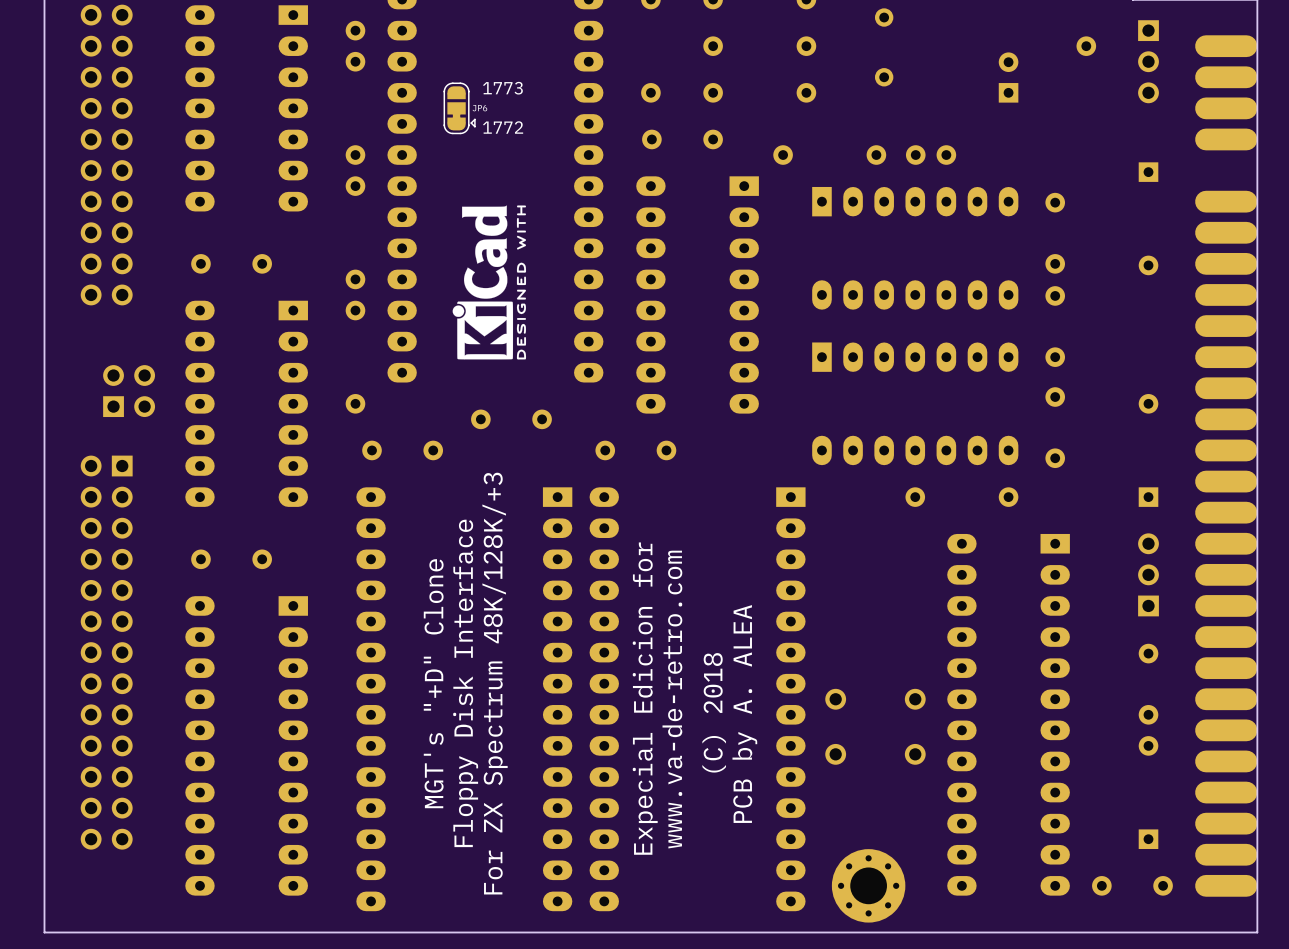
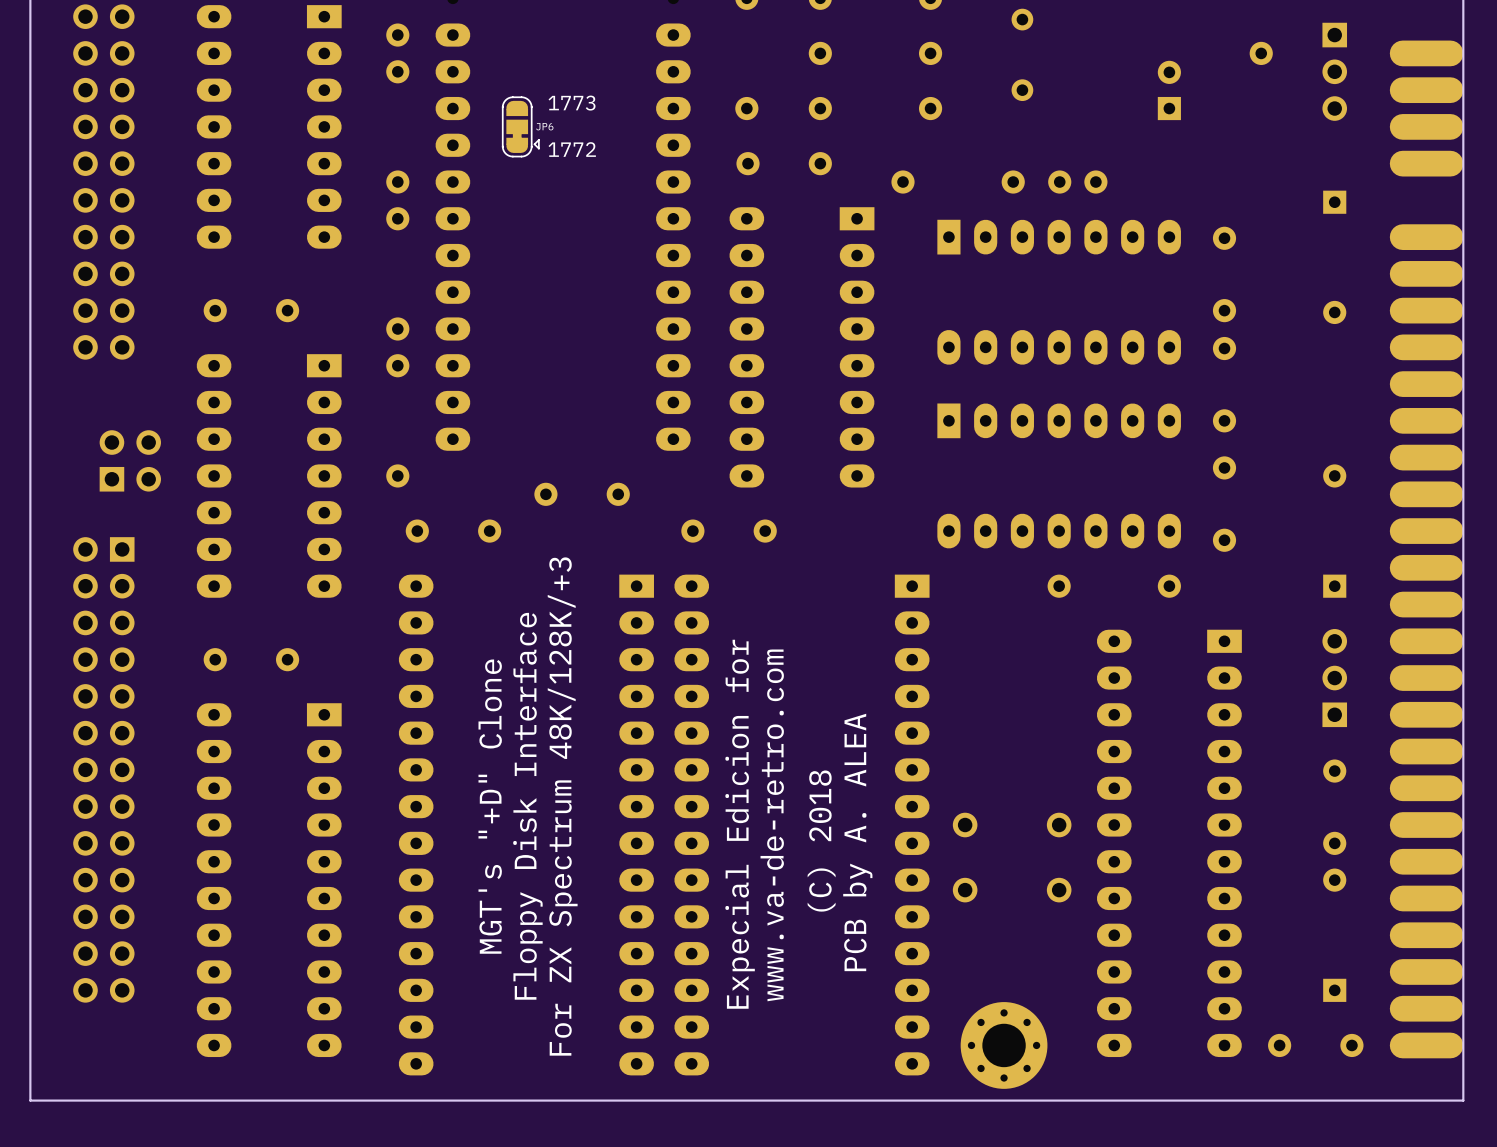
drawing: [452, 205, 527, 360] -> none

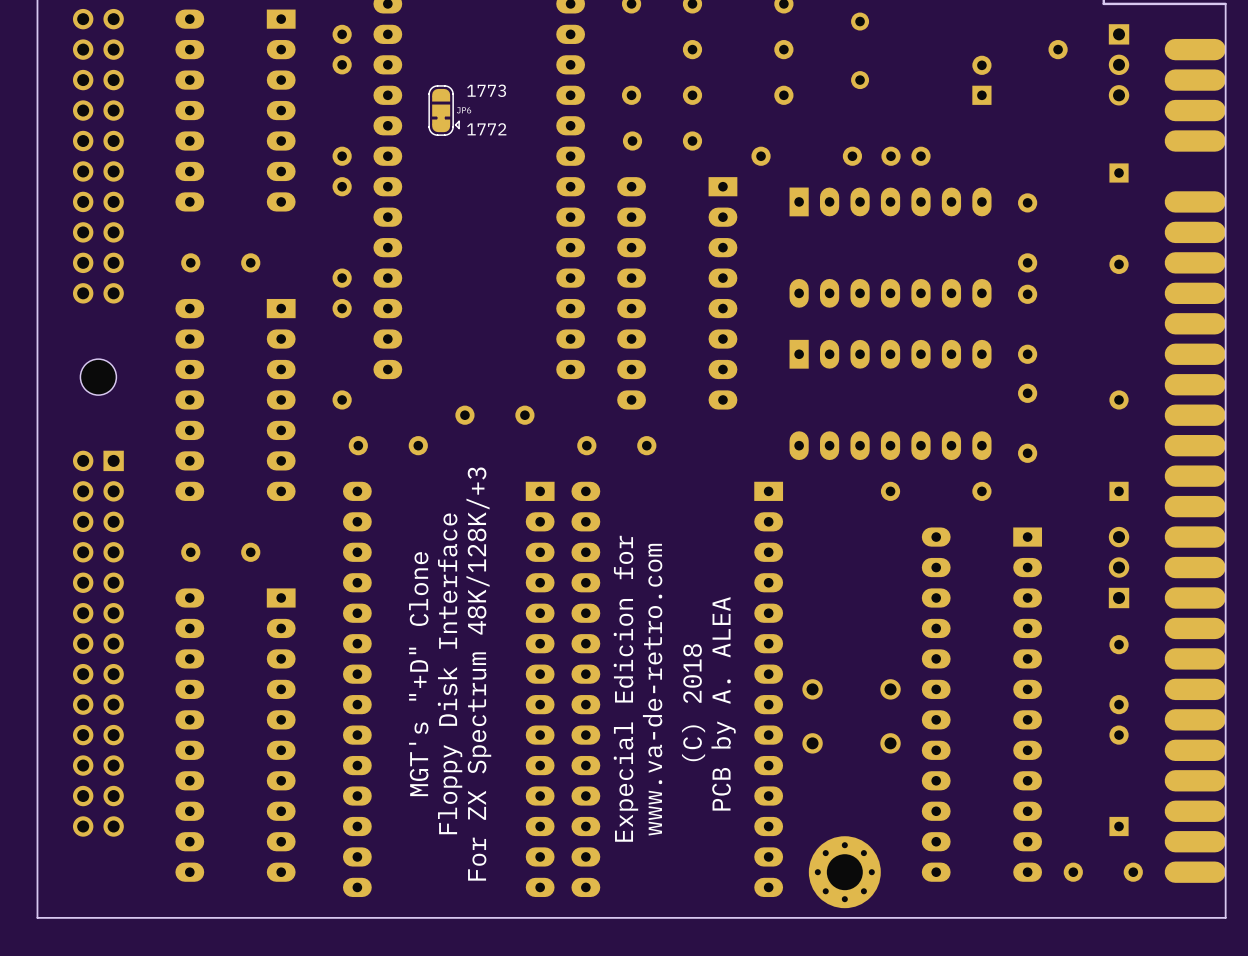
part: none -> (98, 377)
part: (130, 460) -> none

